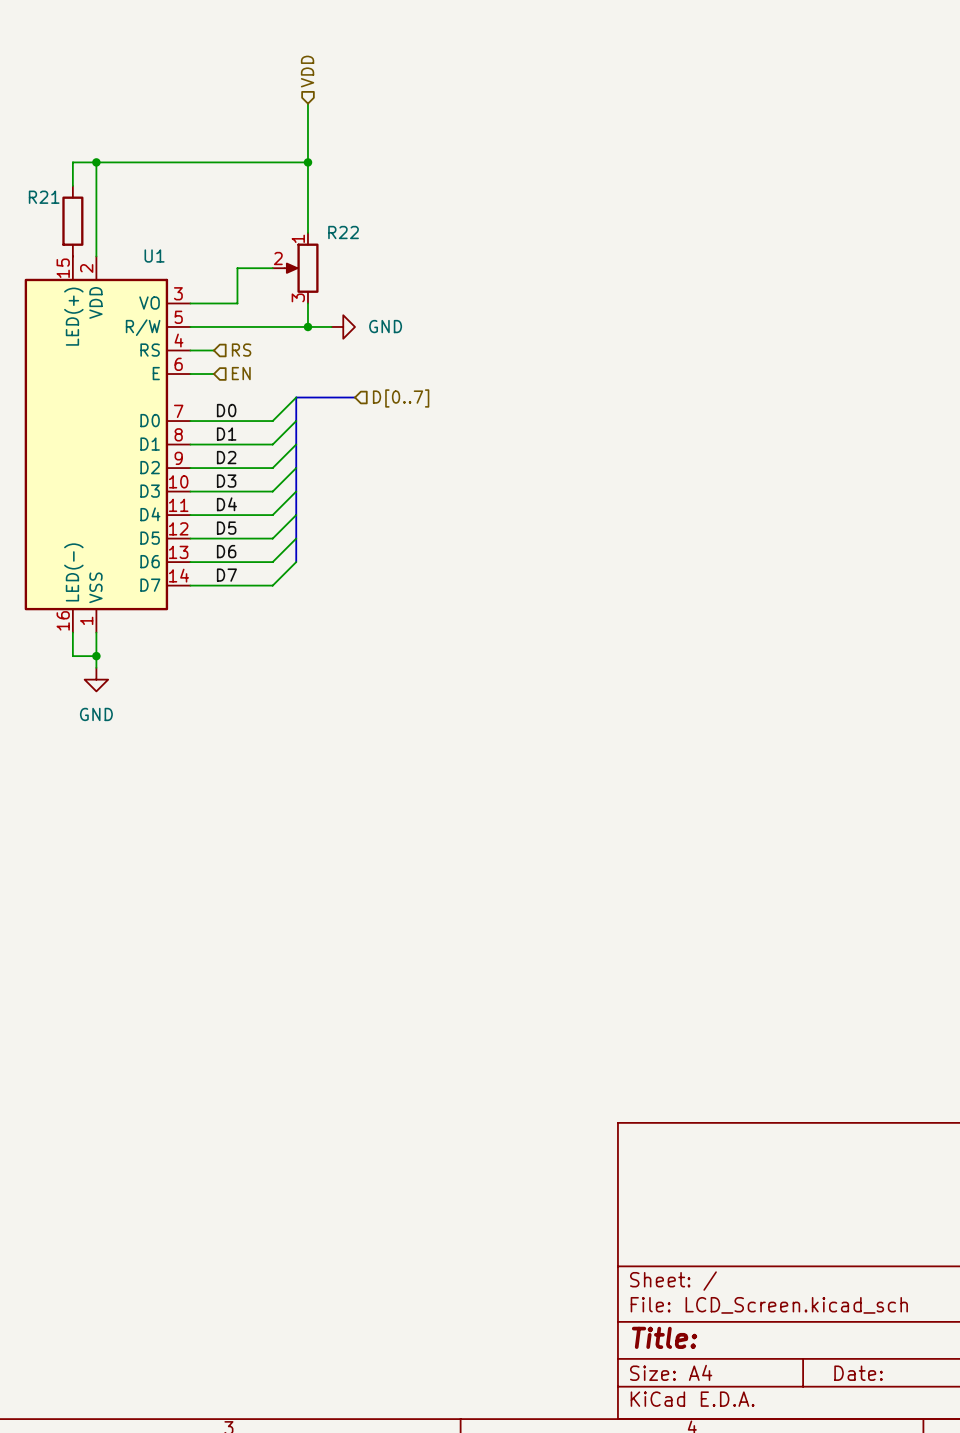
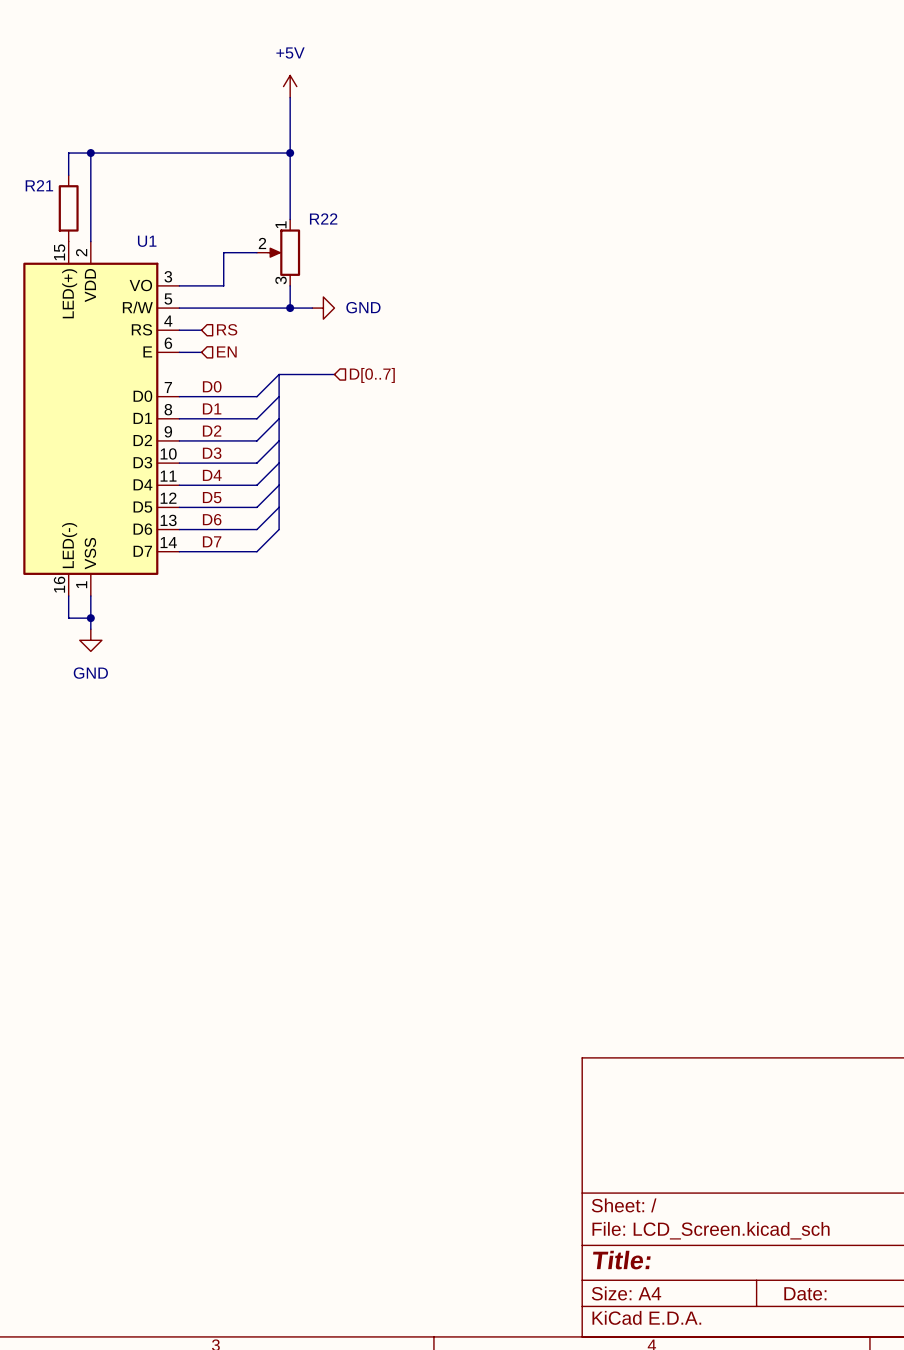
hierarchical label: VDD (307, 71) -> none
power symbol: none -> +5V (290, 86)

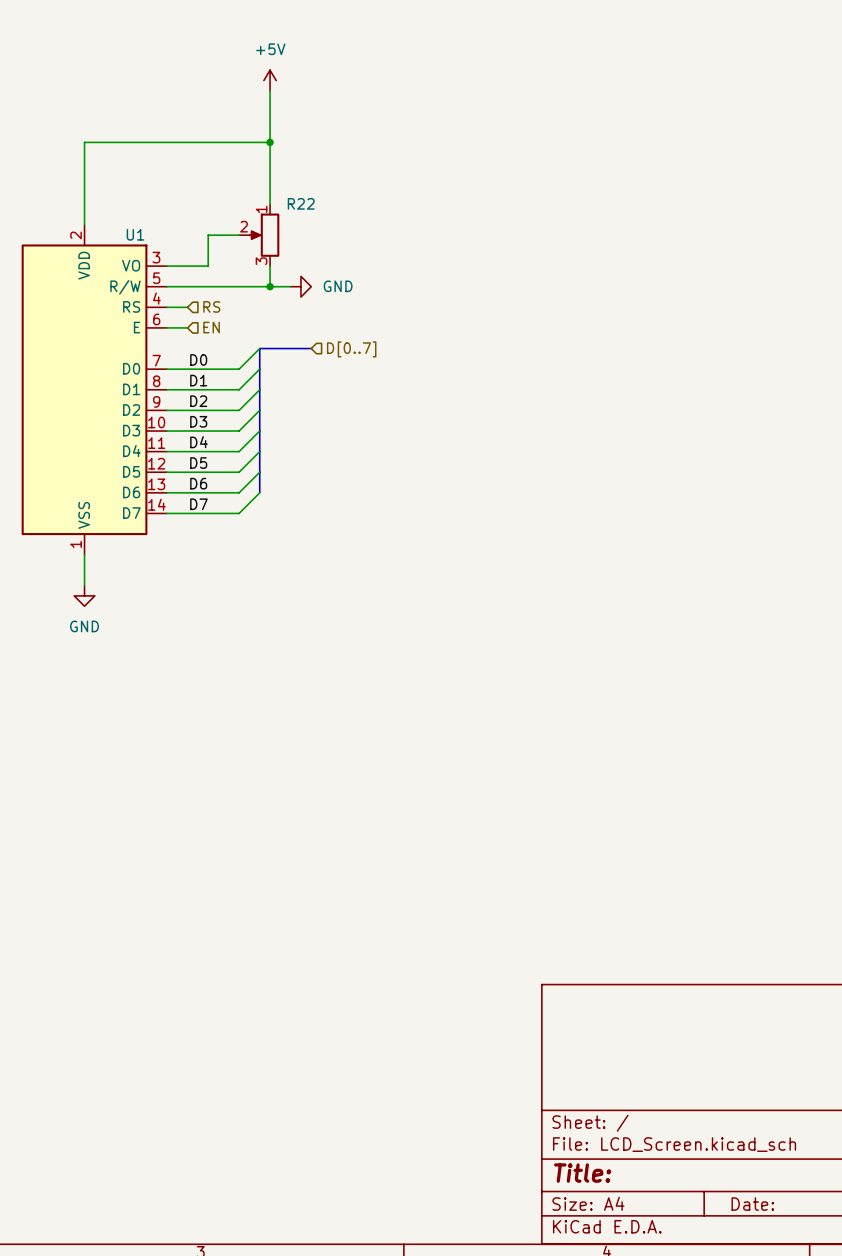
wire: (90, 153) (68, 153) (68, 175) -> none
junction: (90, 153) -> none
R21: (68, 208) -> none
U1 symbol: [23, 241, 180, 597] -> [21, 224, 167, 555]
wire: (68, 596) (68, 618) (90, 618) -> none
junction: (90, 618) -> none

